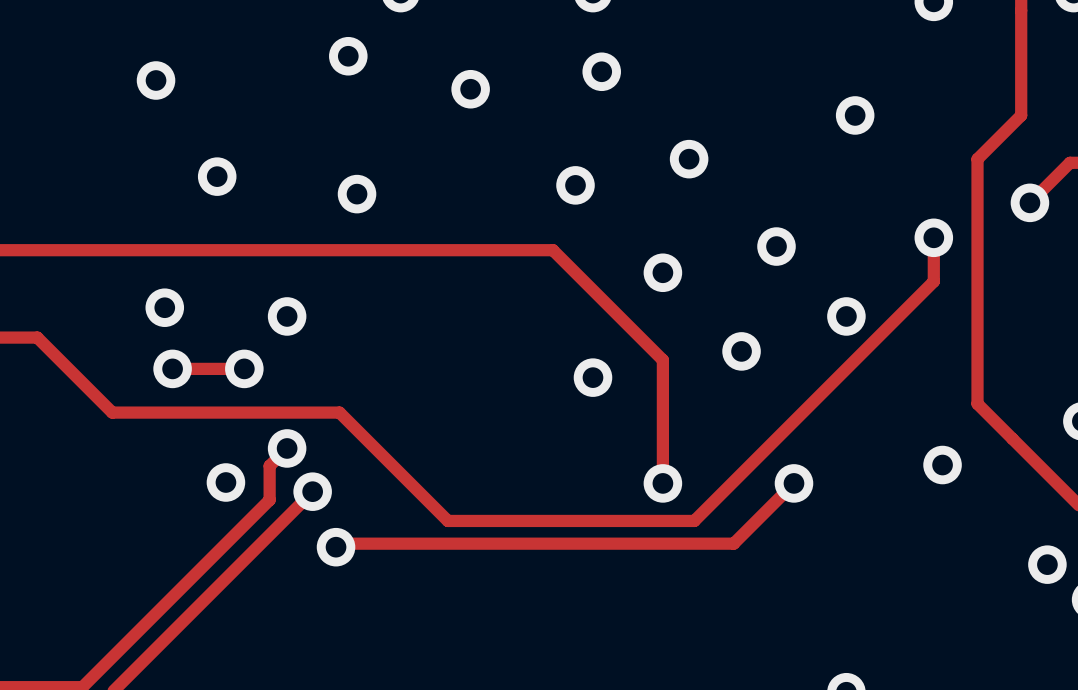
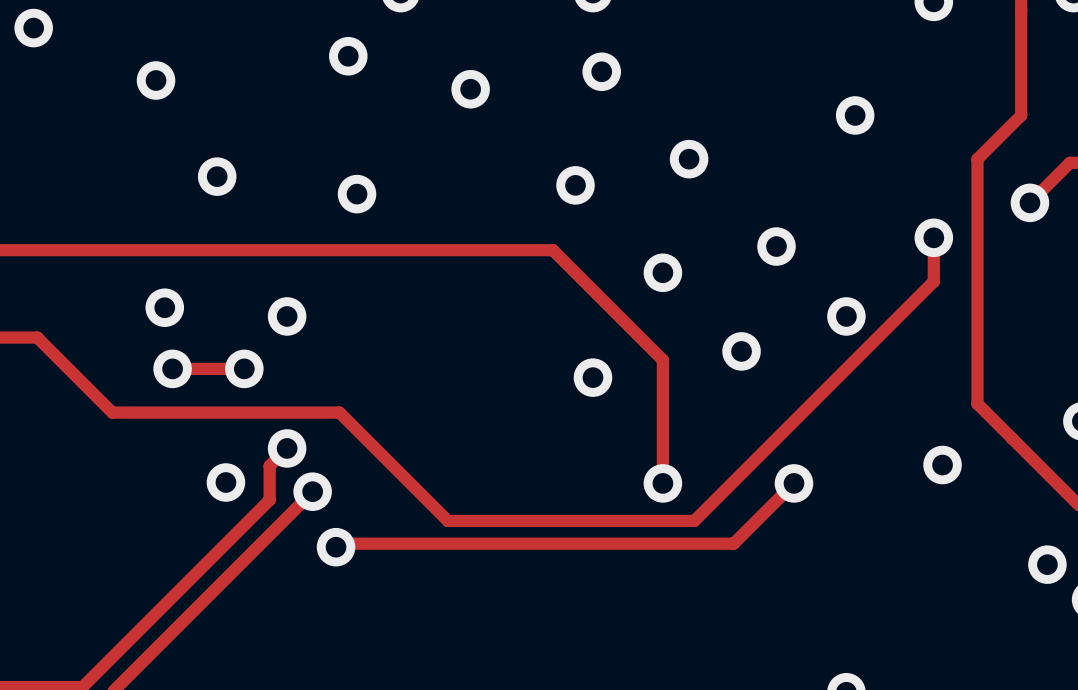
via: none -> (33, 28)

